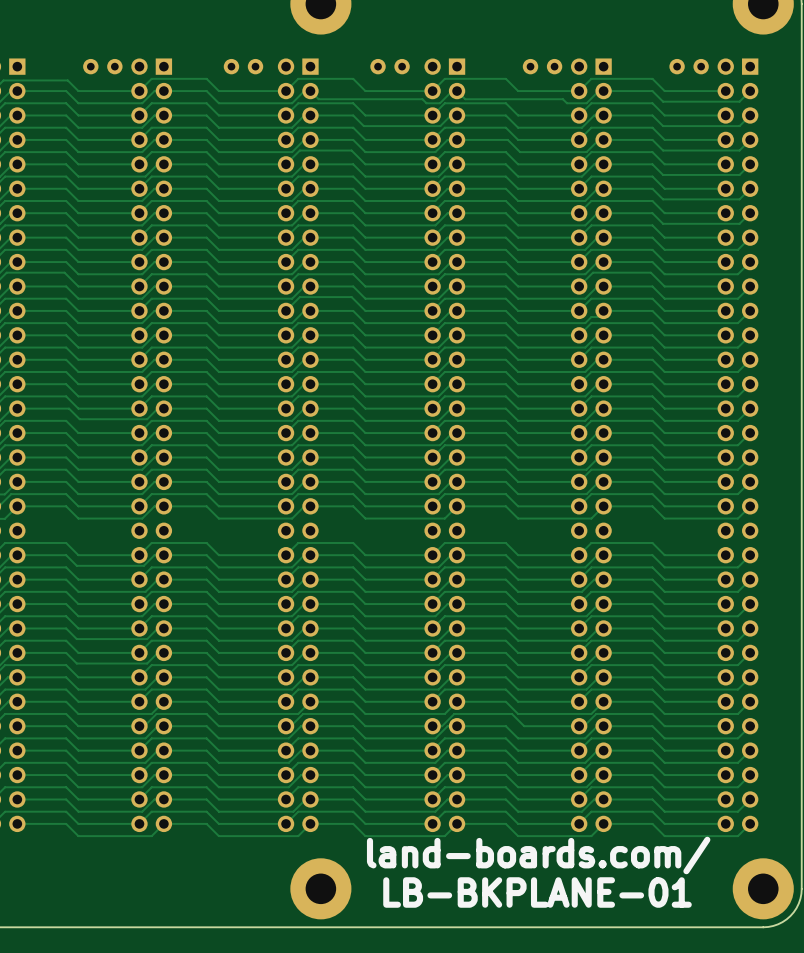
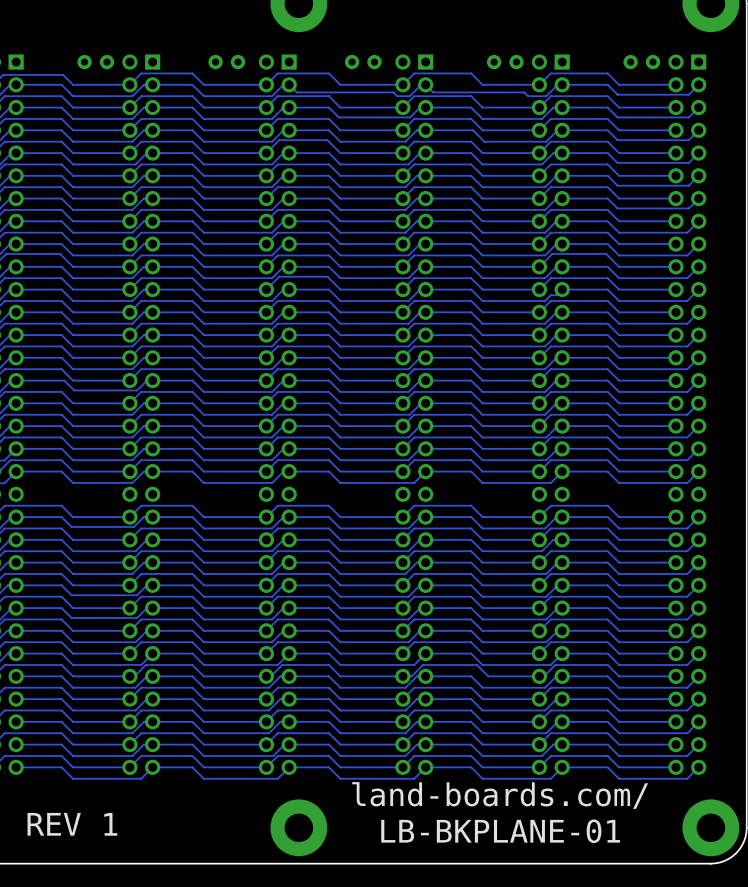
text: none -> REV 1 (72, 824)

